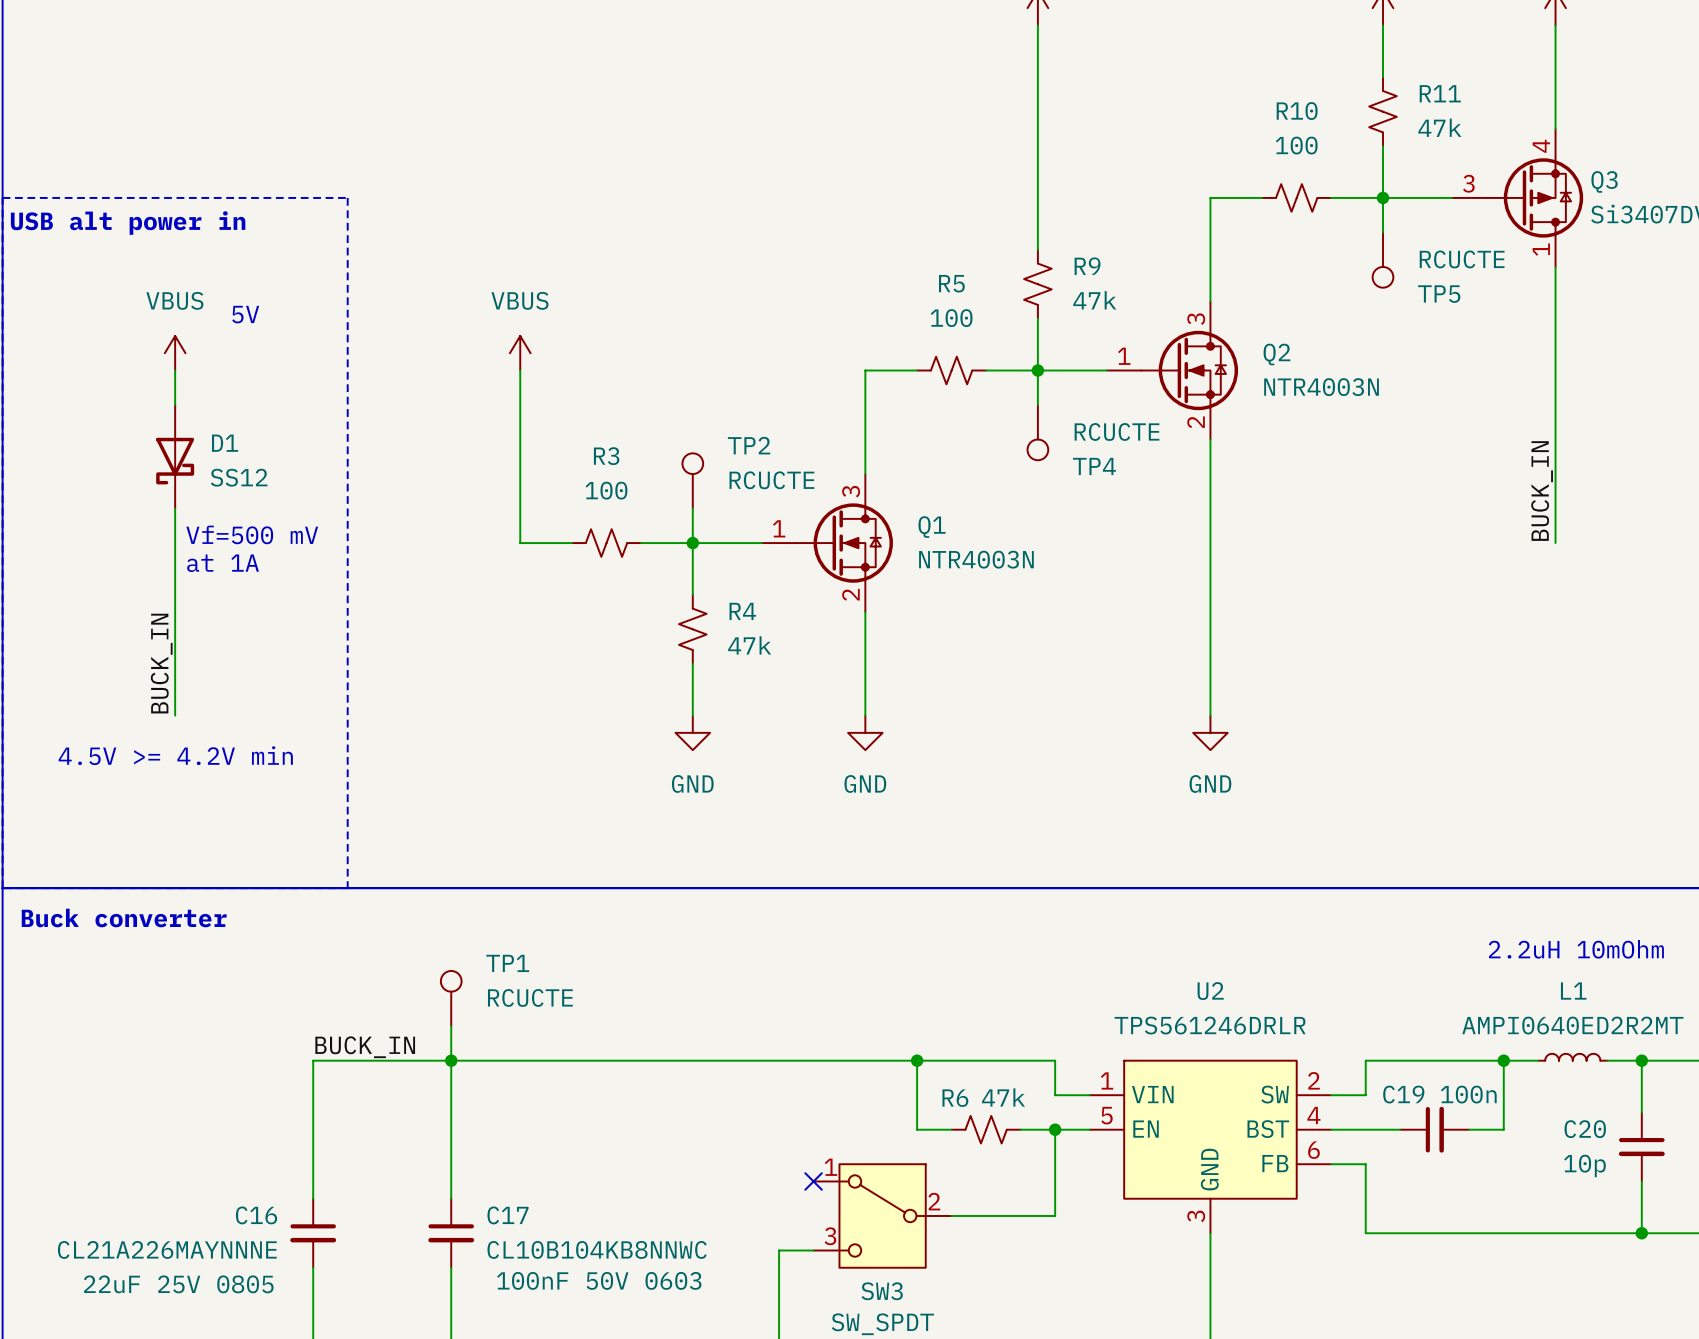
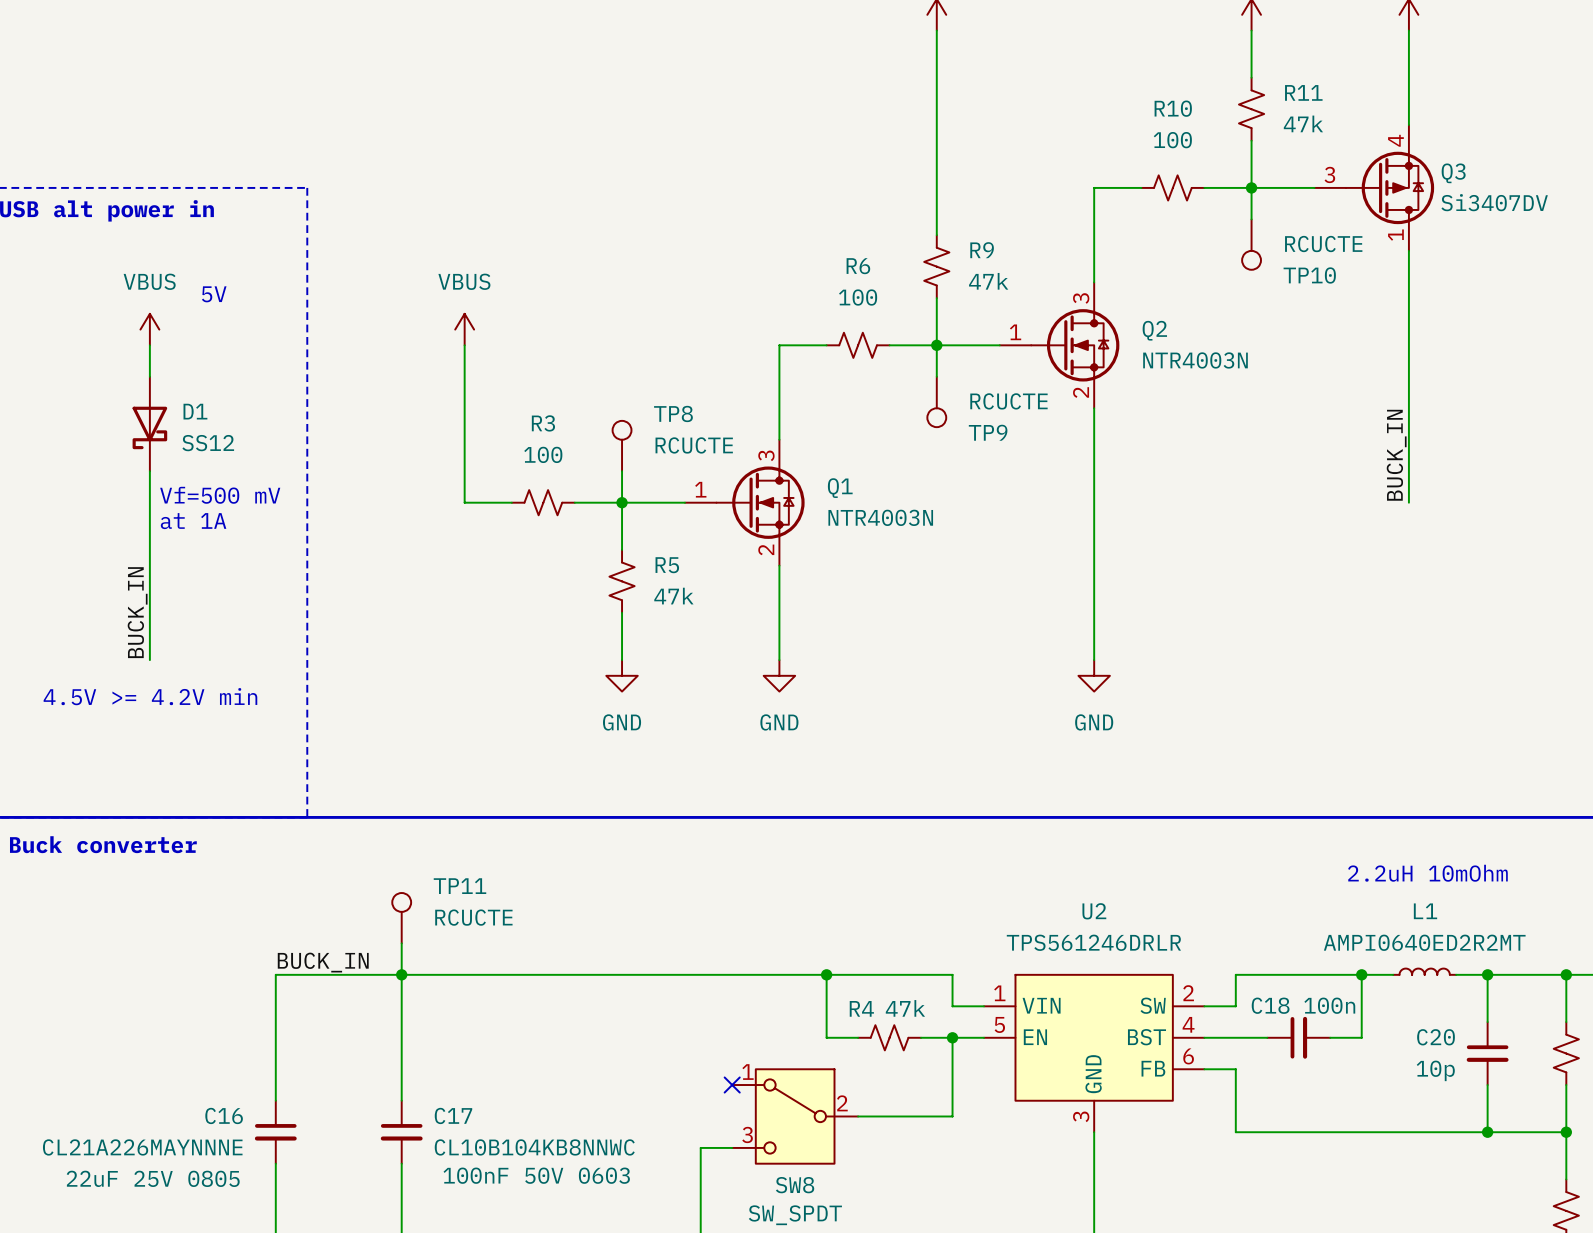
R5 name: R5 (951, 283) -> R6 (858, 266)
TP5 name: TP5 (1439, 294) -> TP10 (1309, 275)
TP2 name: TP2 (749, 445) -> TP8 (673, 413)
TP4 name: TP4 (1094, 466) -> TP9 (988, 432)
R4 name: R4 (742, 611) -> R5 (667, 565)
TP1 name: TP1 (507, 963) -> TP11 (459, 886)
C19 name: C19 (1403, 1094) -> C18 (1270, 1005)
R6 name: R6 (955, 1098) -> R4 (861, 1008)
SW3 name: SW3 (882, 1291) -> SW8 (795, 1185)

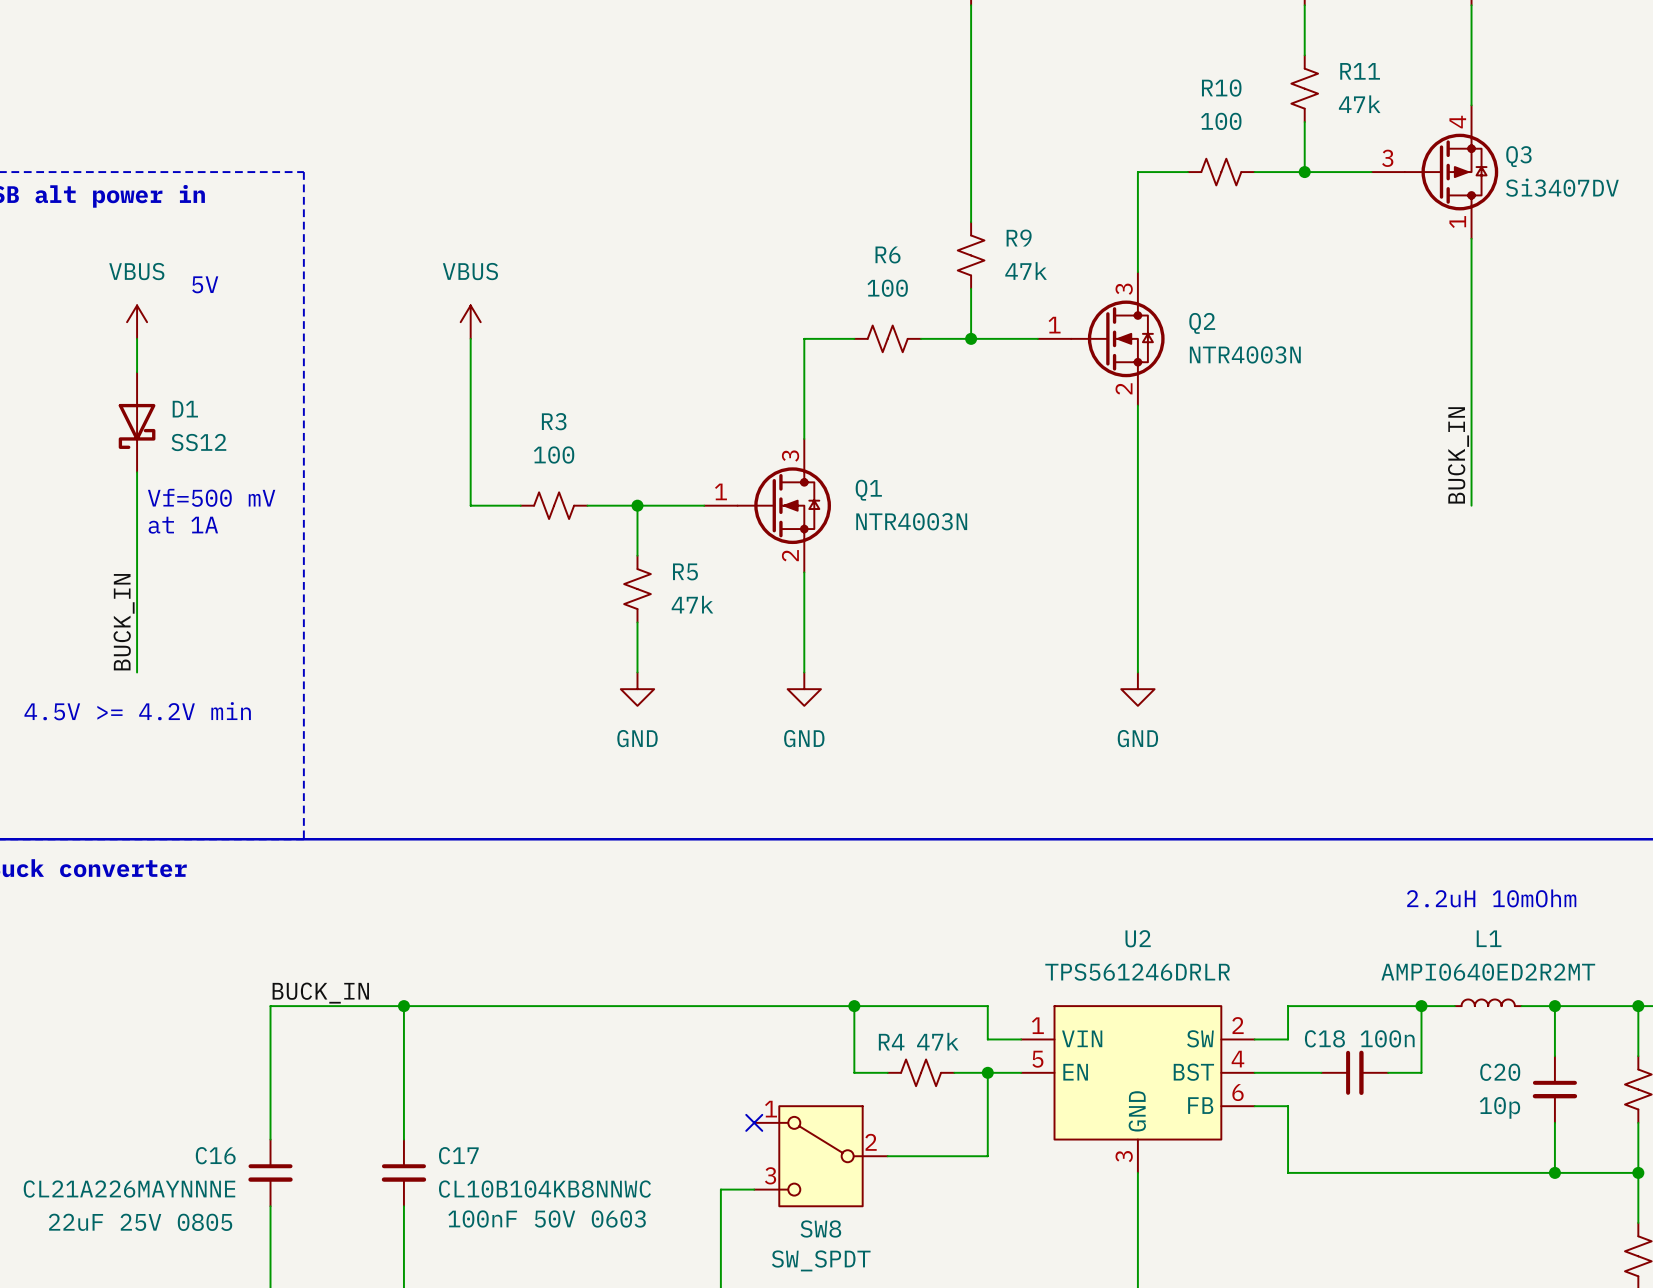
wire: (1251, 187) (1251, 219) -> none
TP10: RCUCTE (1251, 244) -> none
wire: (936, 345) (936, 376) -> none
TP9: RCUCTE (936, 401) -> none
TP8: RCUCTE (622, 446) -> none
wire: (622, 471) (622, 502) -> none
TP11: RCUCTE (401, 918) -> none
wire: (401, 943) (401, 974) -> none

